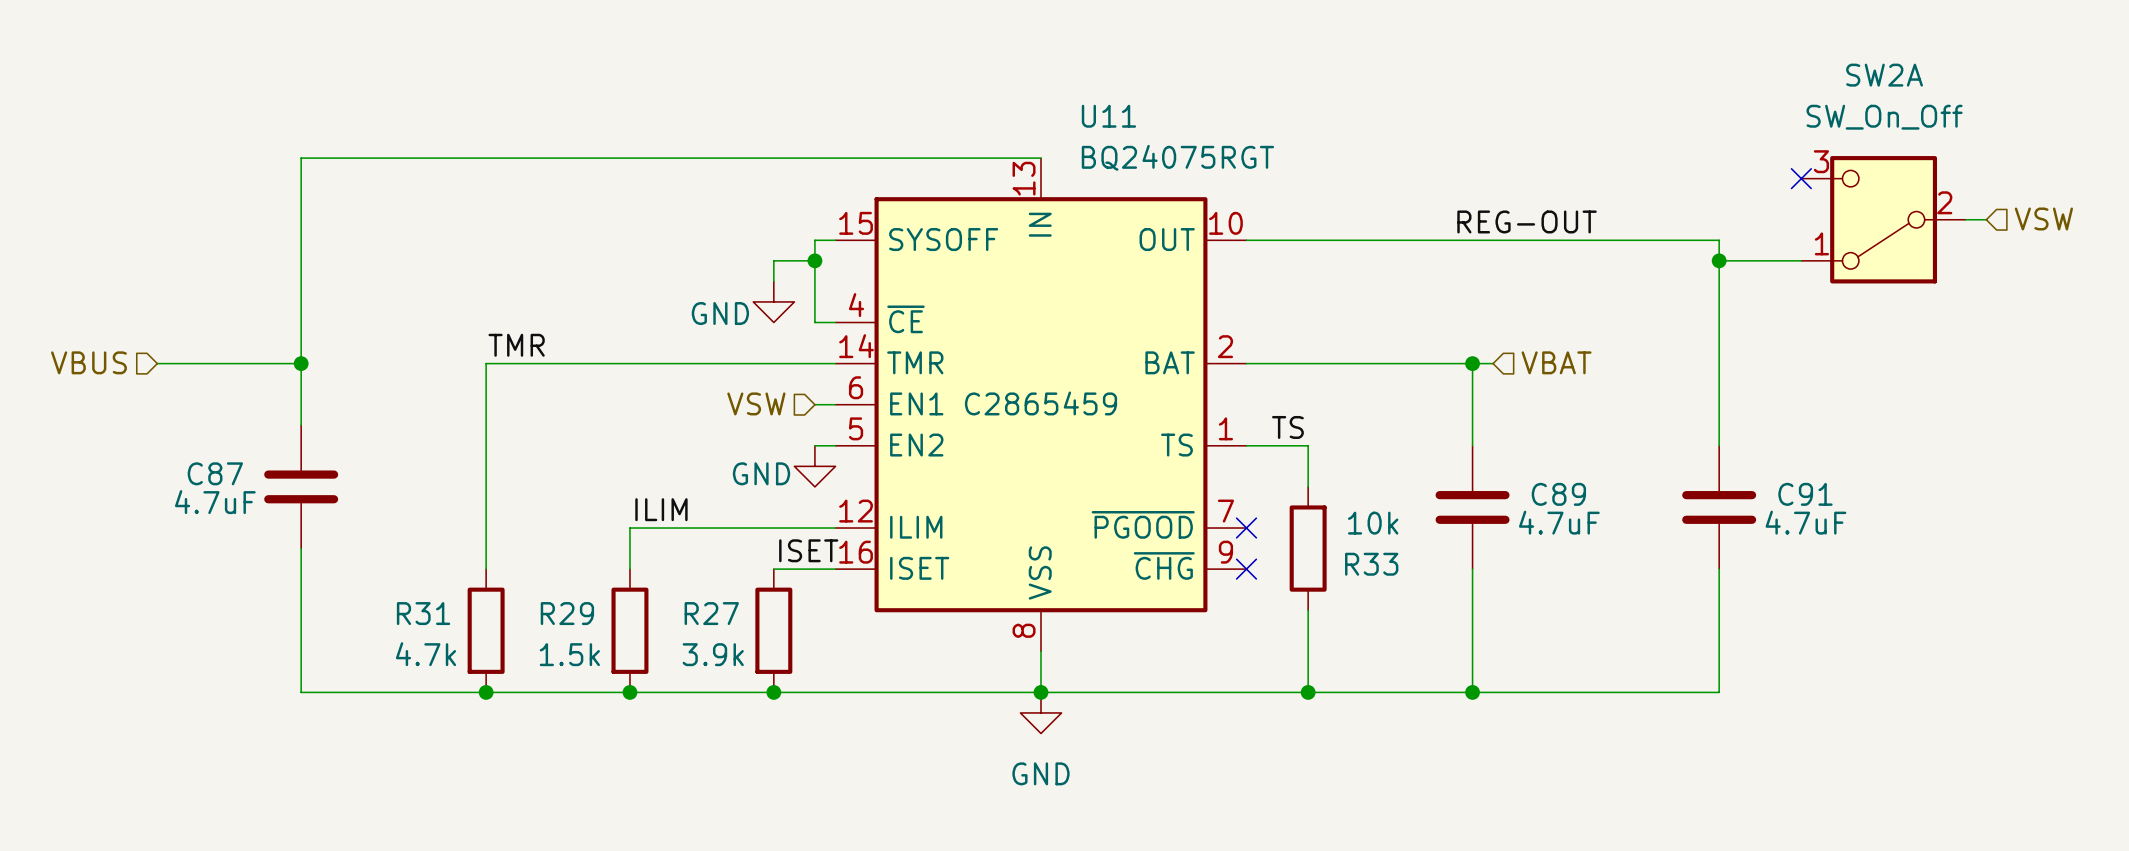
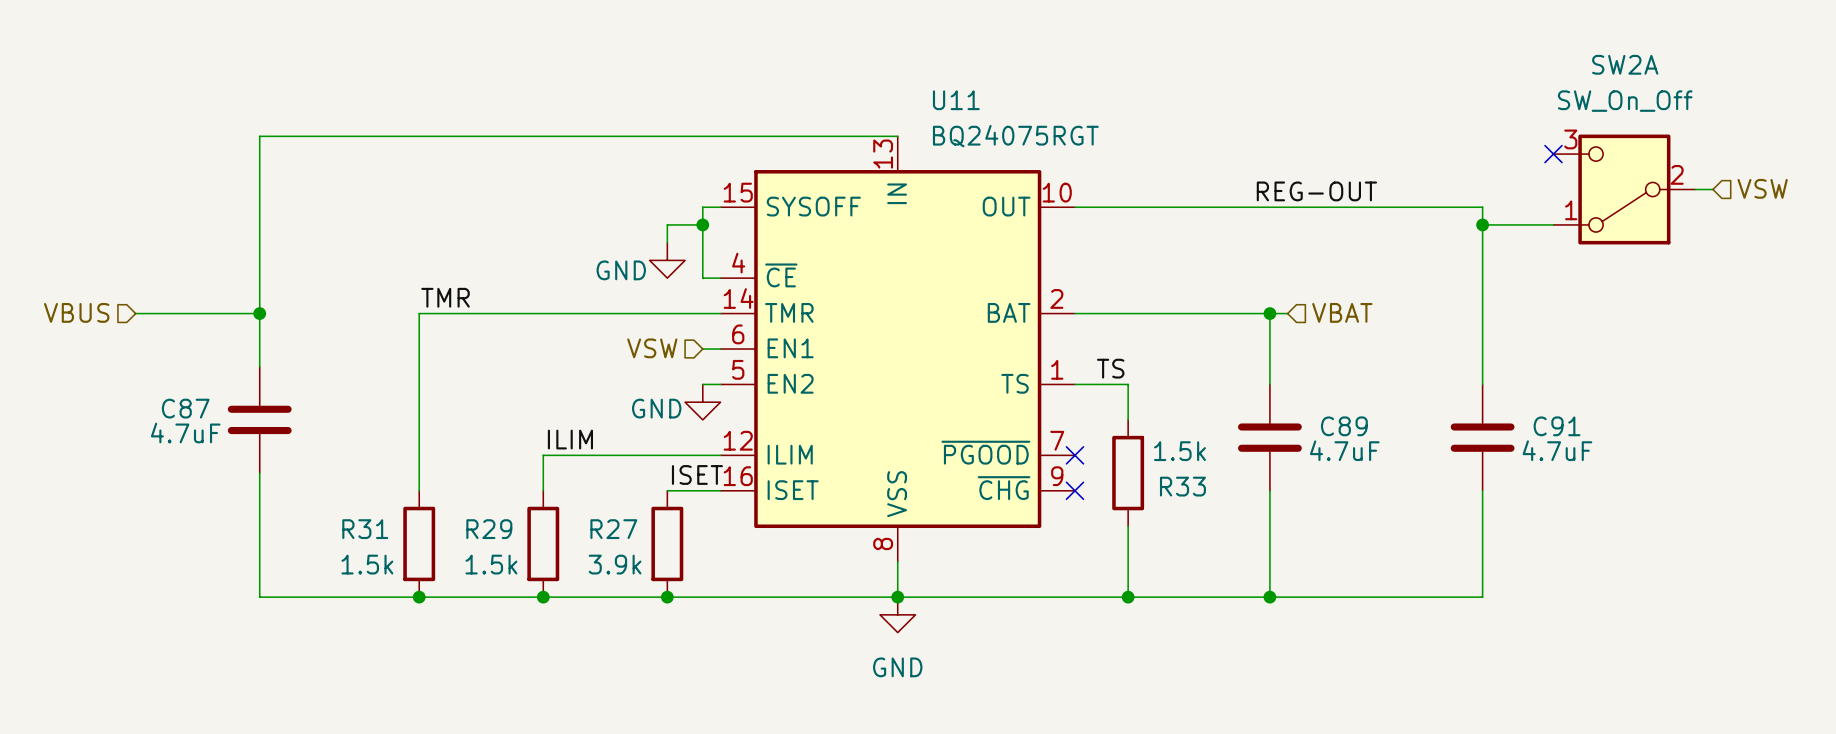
U11 text: C2865459 (1040, 403) -> none
R33 value: 10k (1373, 523) -> 1.5k (1179, 451)
R31 value: 4.7k (425, 654) -> 1.5k (367, 564)

